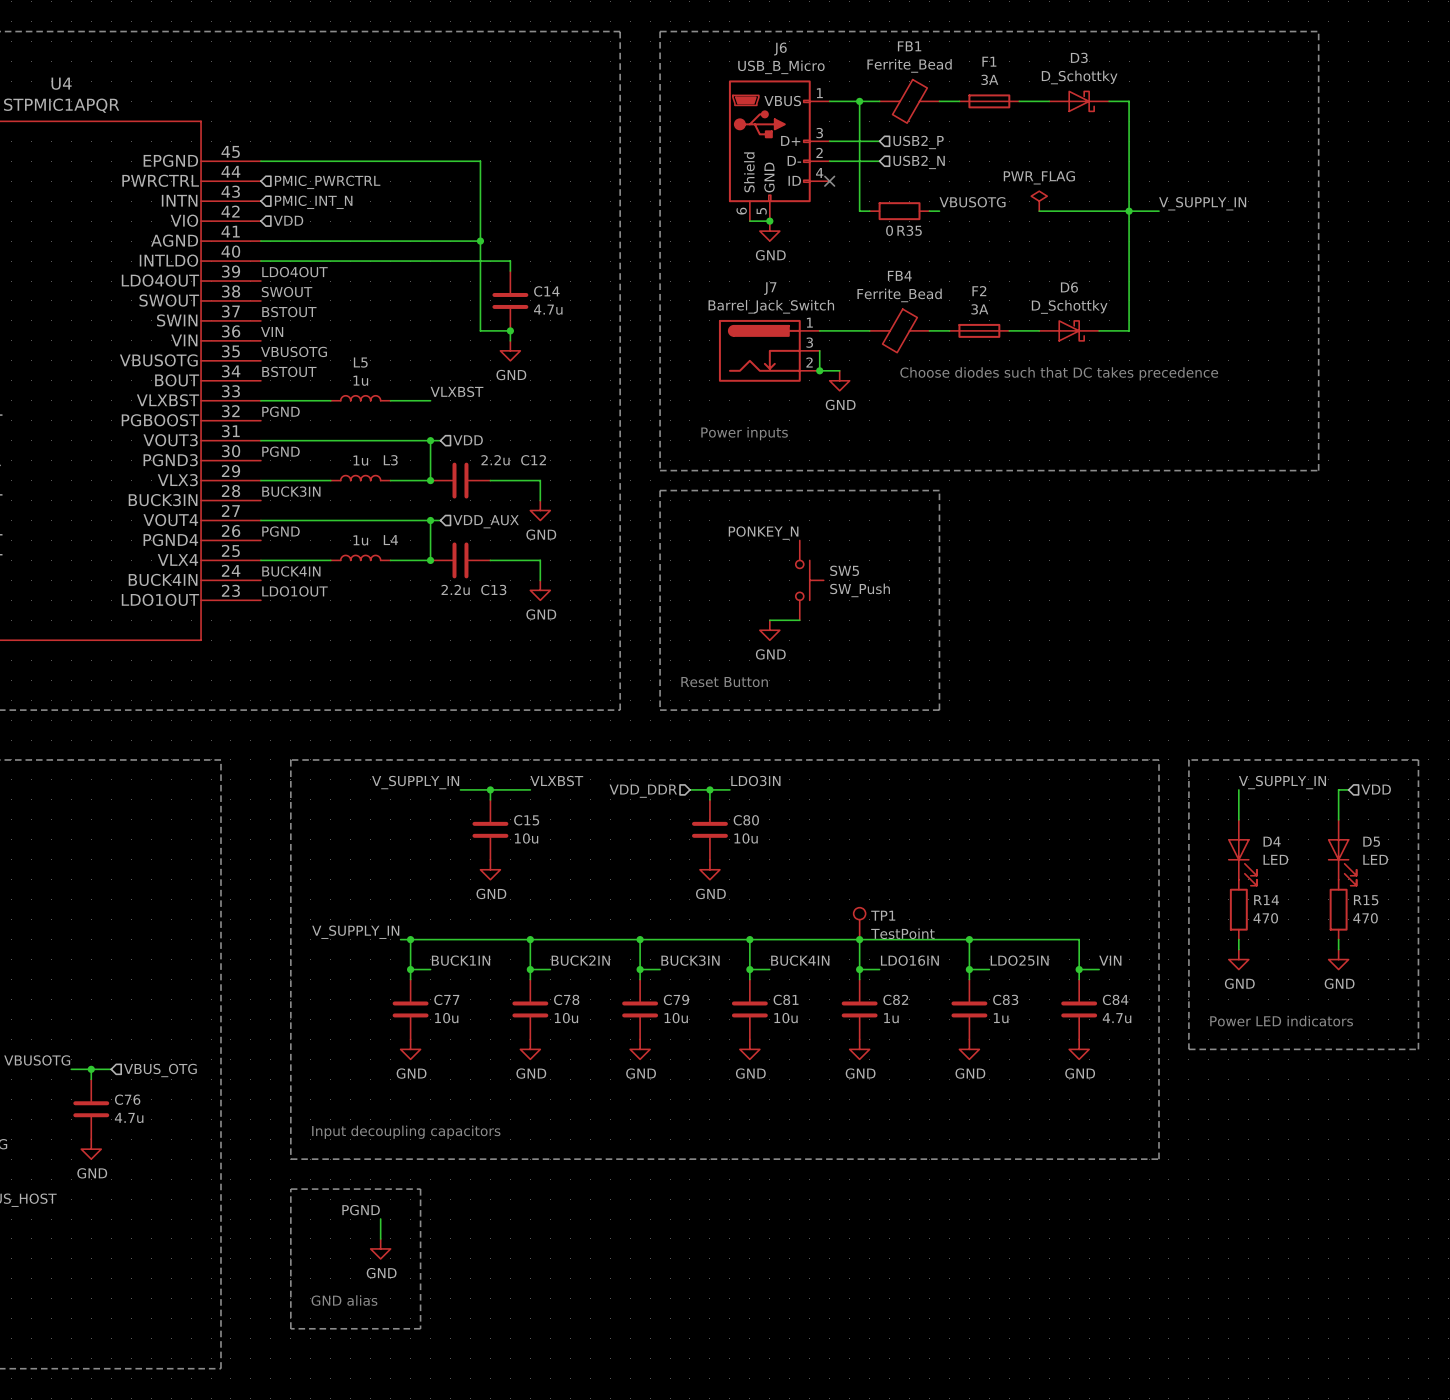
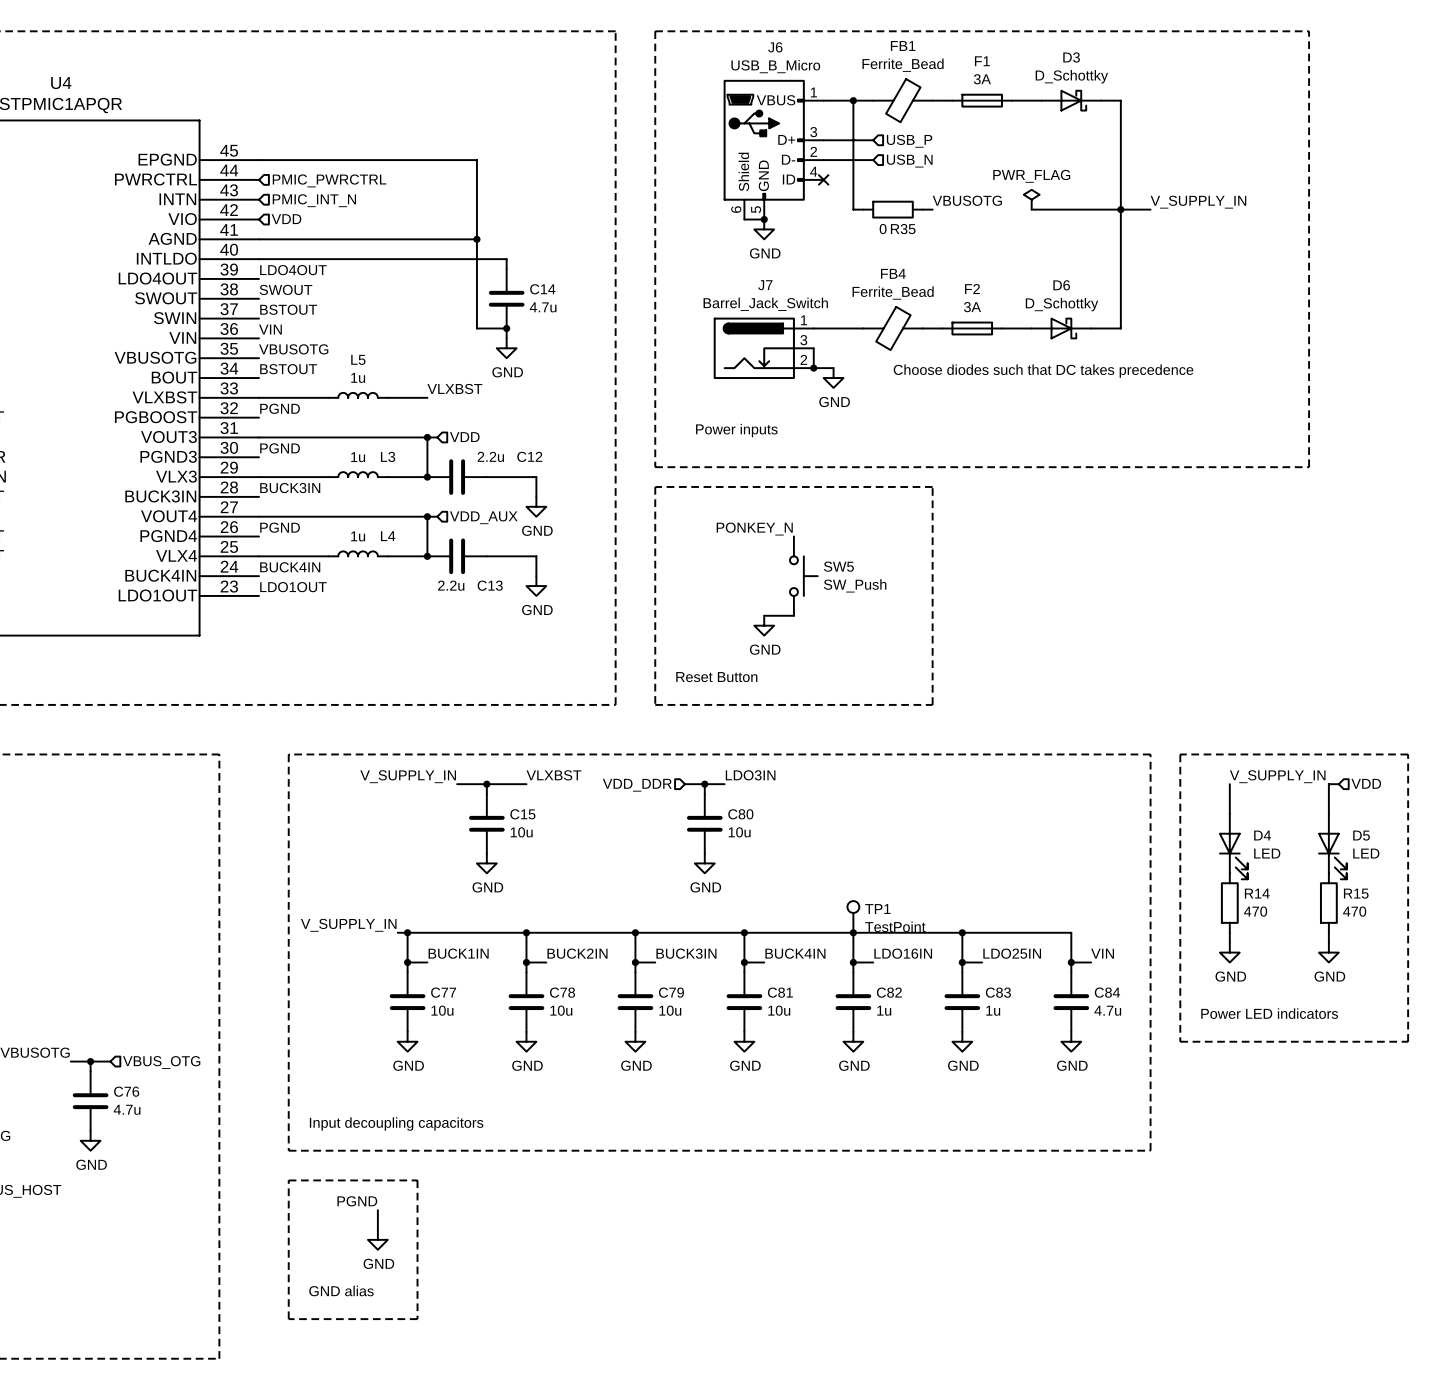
hierarchical label: USB2_P (918, 142) -> USB_P (909, 141)
hierarchical label: USB2_N (919, 162) -> USB_N (909, 161)

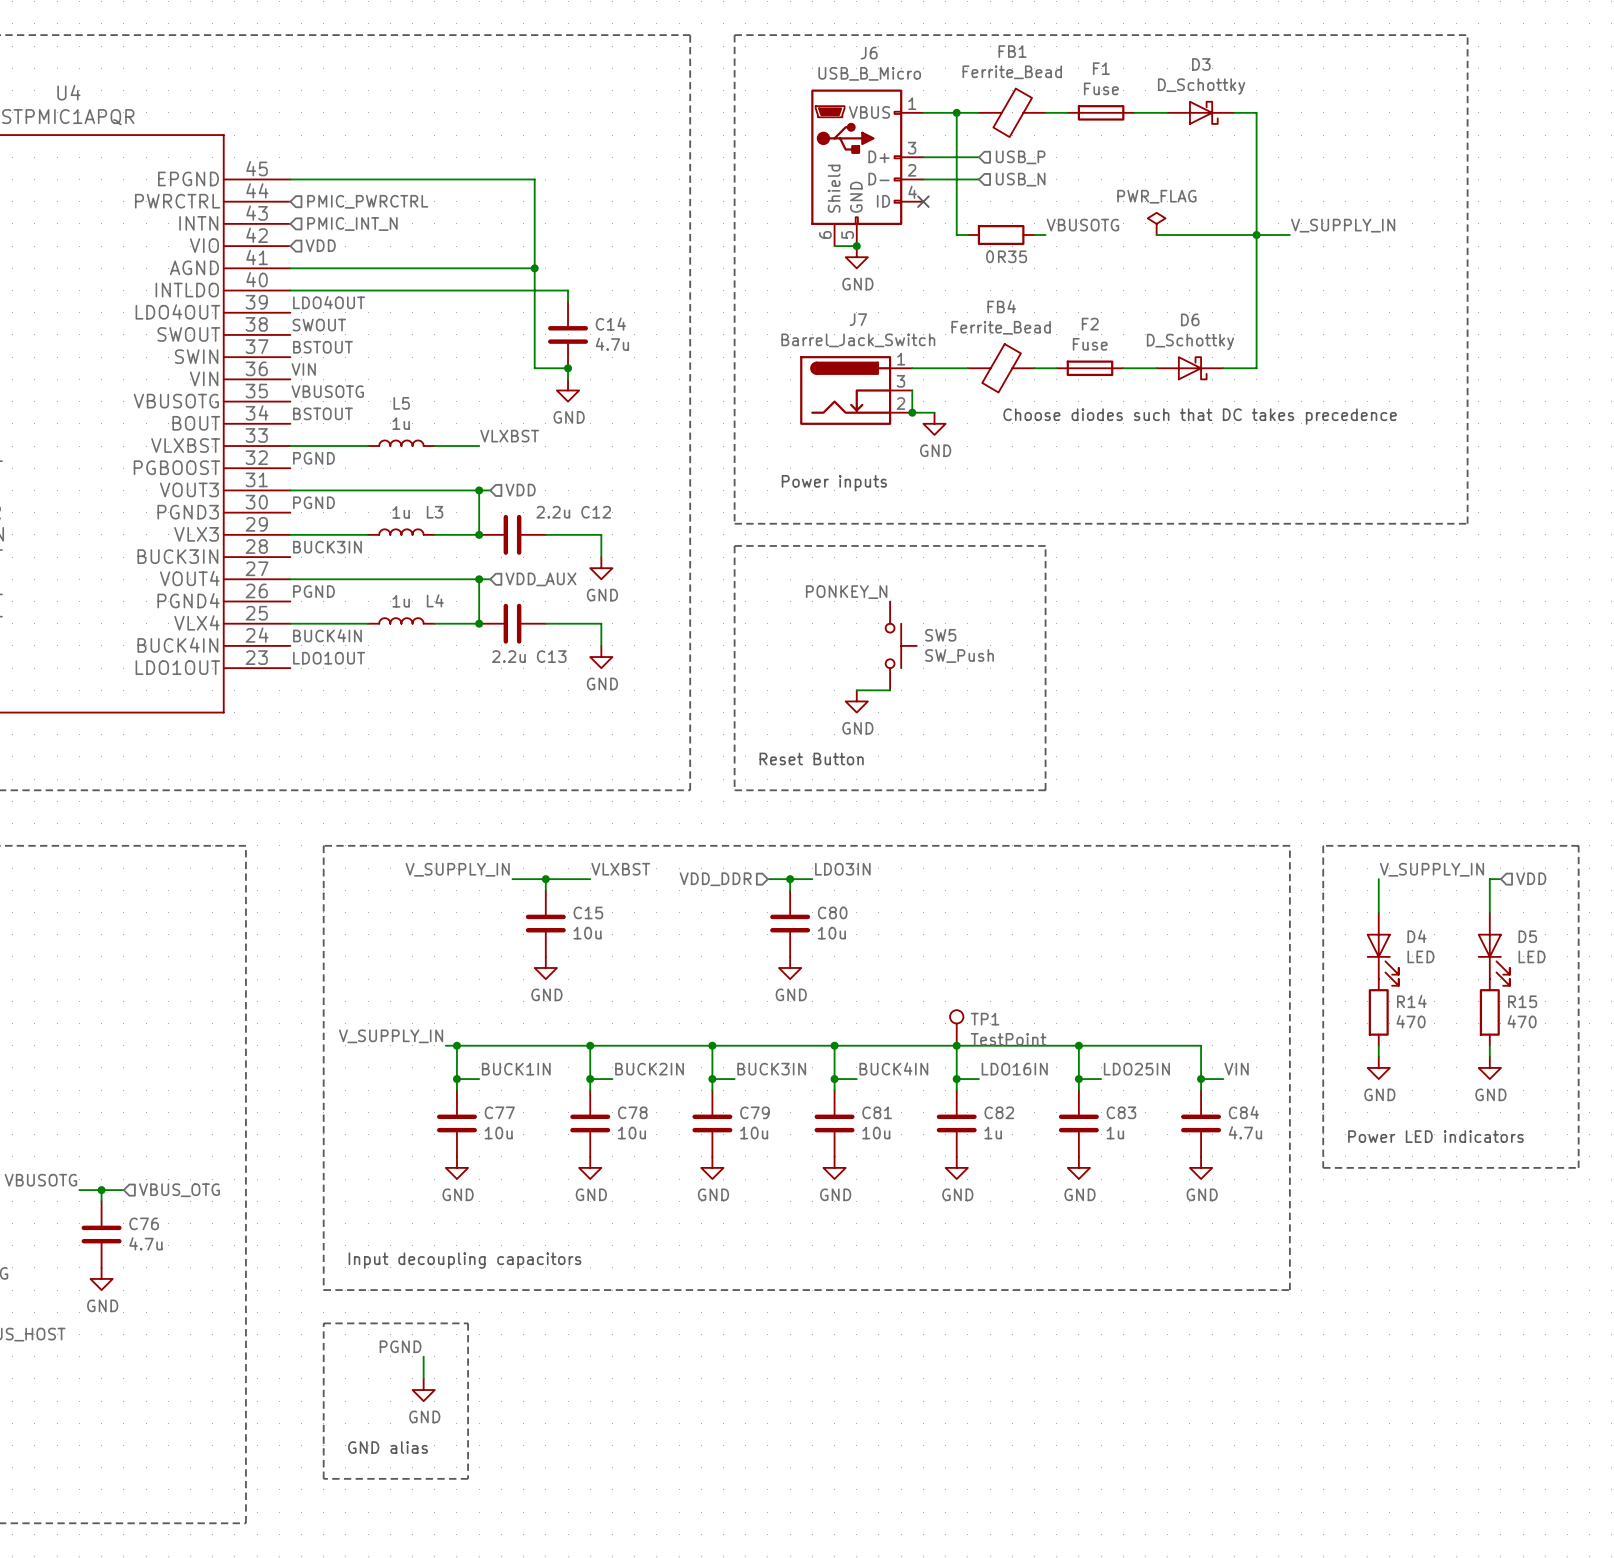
F1 value: 3A (982, 79) -> Fuse (1101, 88)
F2 value: 3A (972, 307) -> Fuse (1090, 344)

